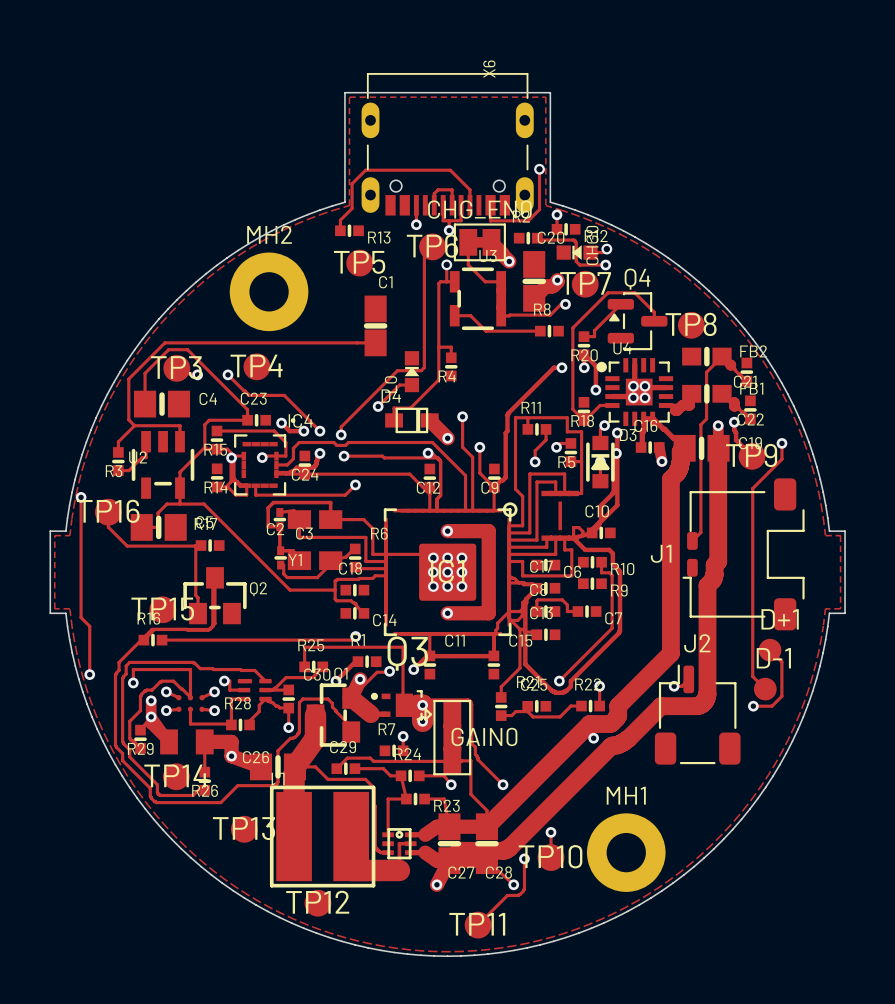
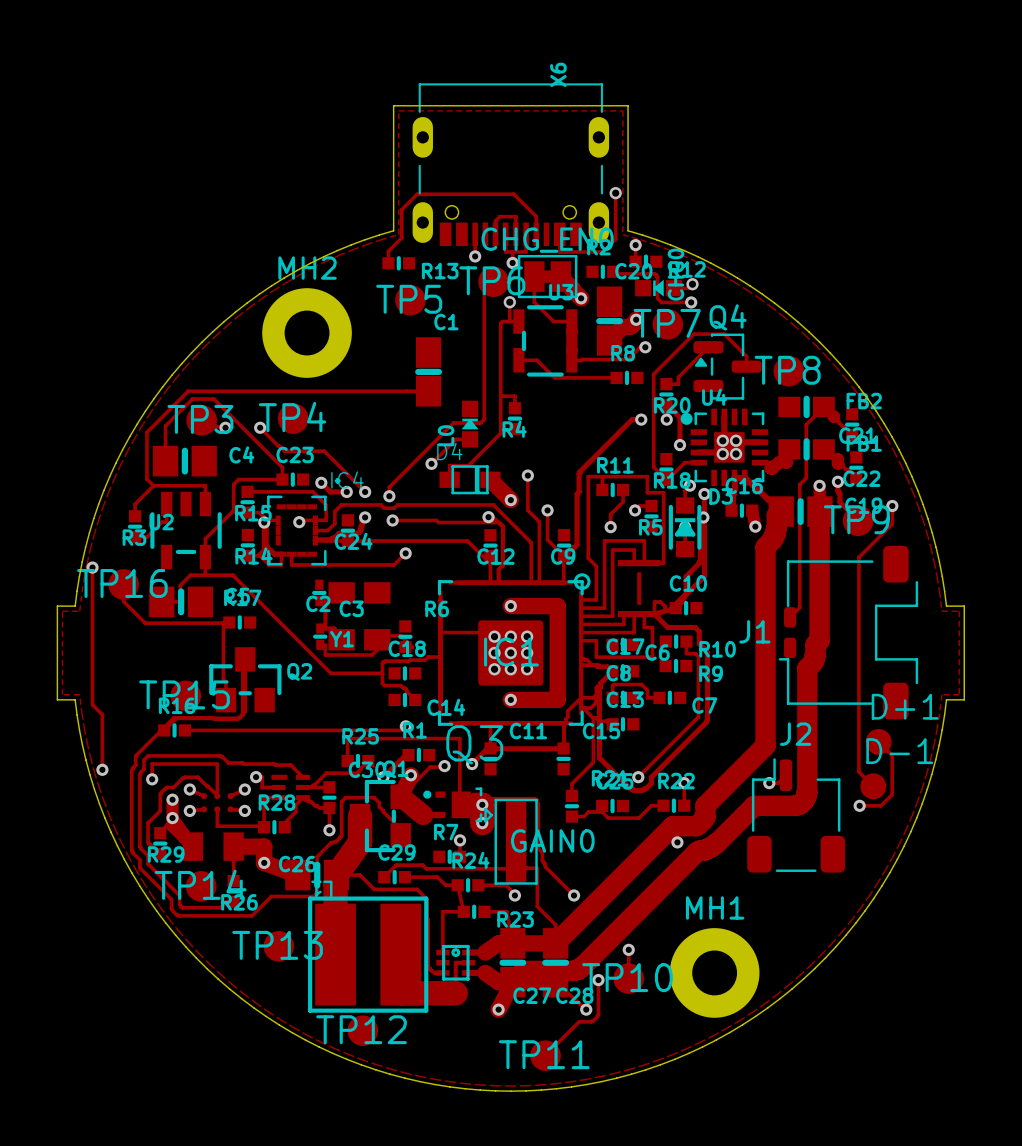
track: (279, 512) (294, 510) (299, 519) (299, 537) (365, 537) (365, 561) (386, 561) -> none
track: (355, 548) (345, 557) (330, 560) (330, 564) (317, 577) (287, 577) (283, 574) (283, 565) (280, 565) -> none
track: (285, 550) (279, 549) (279, 526) (268, 526) (268, 507) (273, 502) (330, 502) (330, 519) (363, 519) (372, 528) (372, 554) (386, 554) -> (325, 628) (325, 599)
track: none -> (325, 644) (325, 655) (372, 655) (387, 639) (387, 635) (400, 635) (412, 647)
track: (355, 567) (386, 568) -> none

